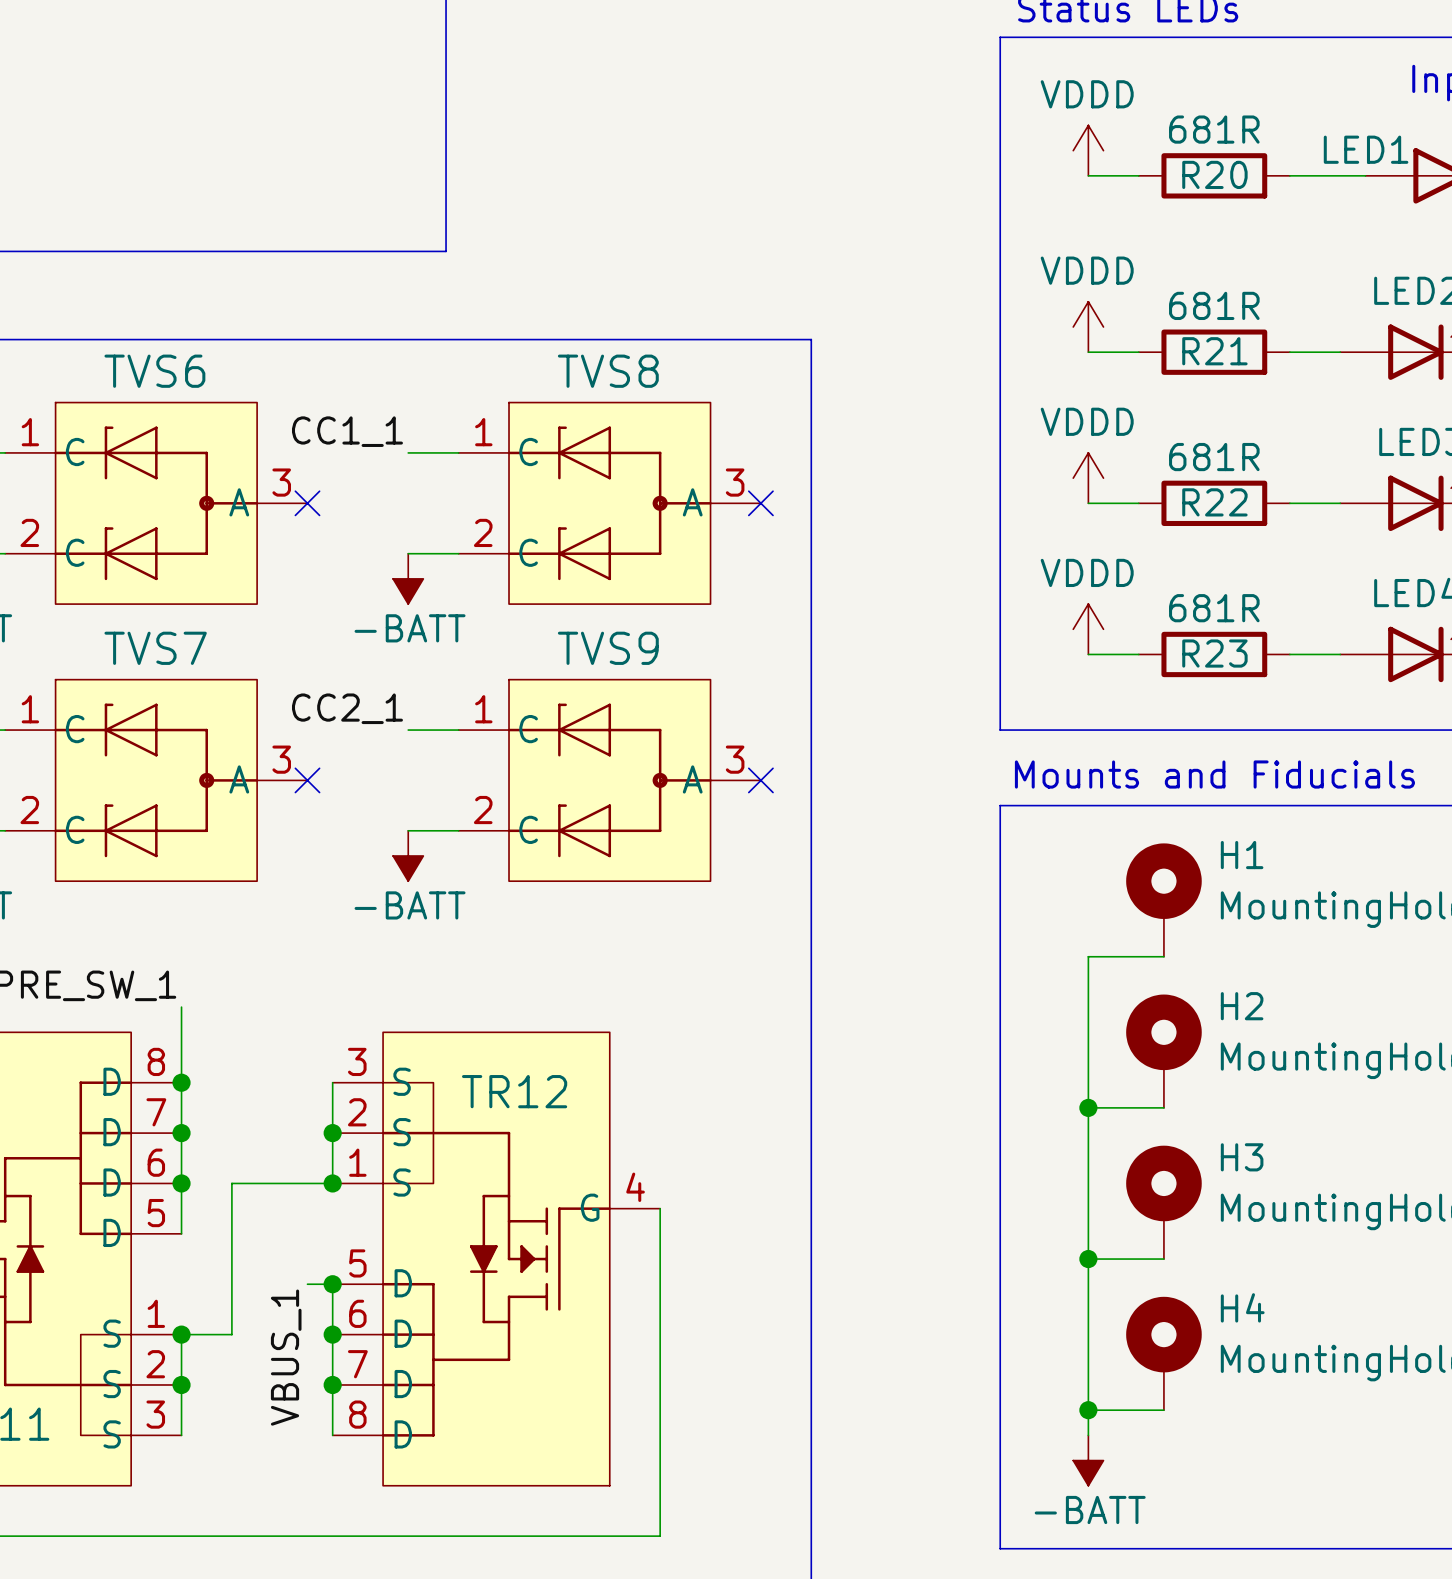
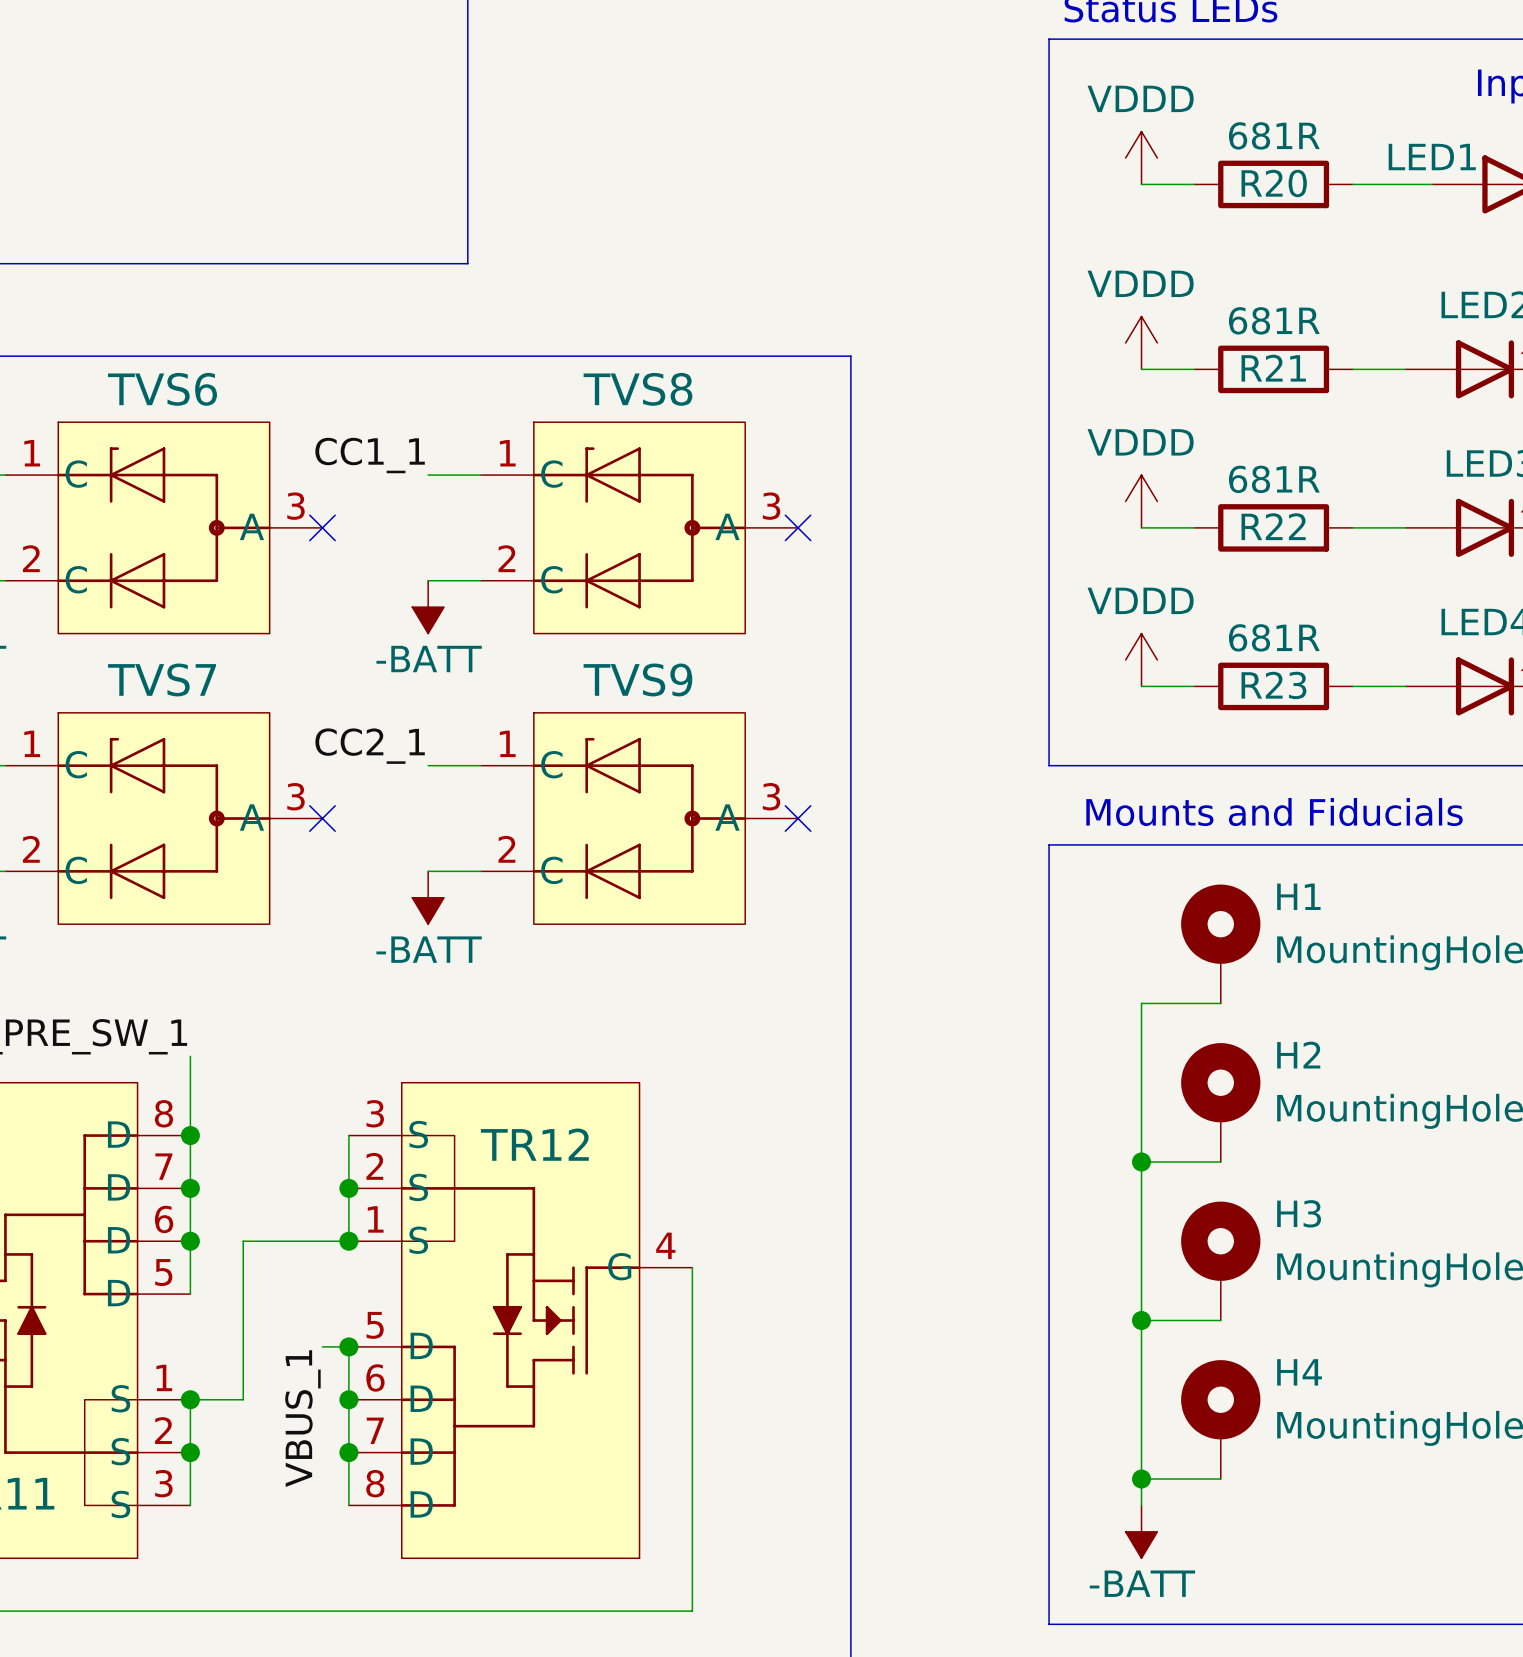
TVS6 symbol: [5, 402, 308, 605] -> [5, 422, 323, 634]
TVS8 symbol: [458, 402, 761, 605] -> [481, 422, 799, 634]
TVS7 symbol: [5, 679, 308, 882] -> [5, 712, 323, 925]
TVS9 symbol: [458, 679, 761, 882] -> [481, 712, 799, 925]

